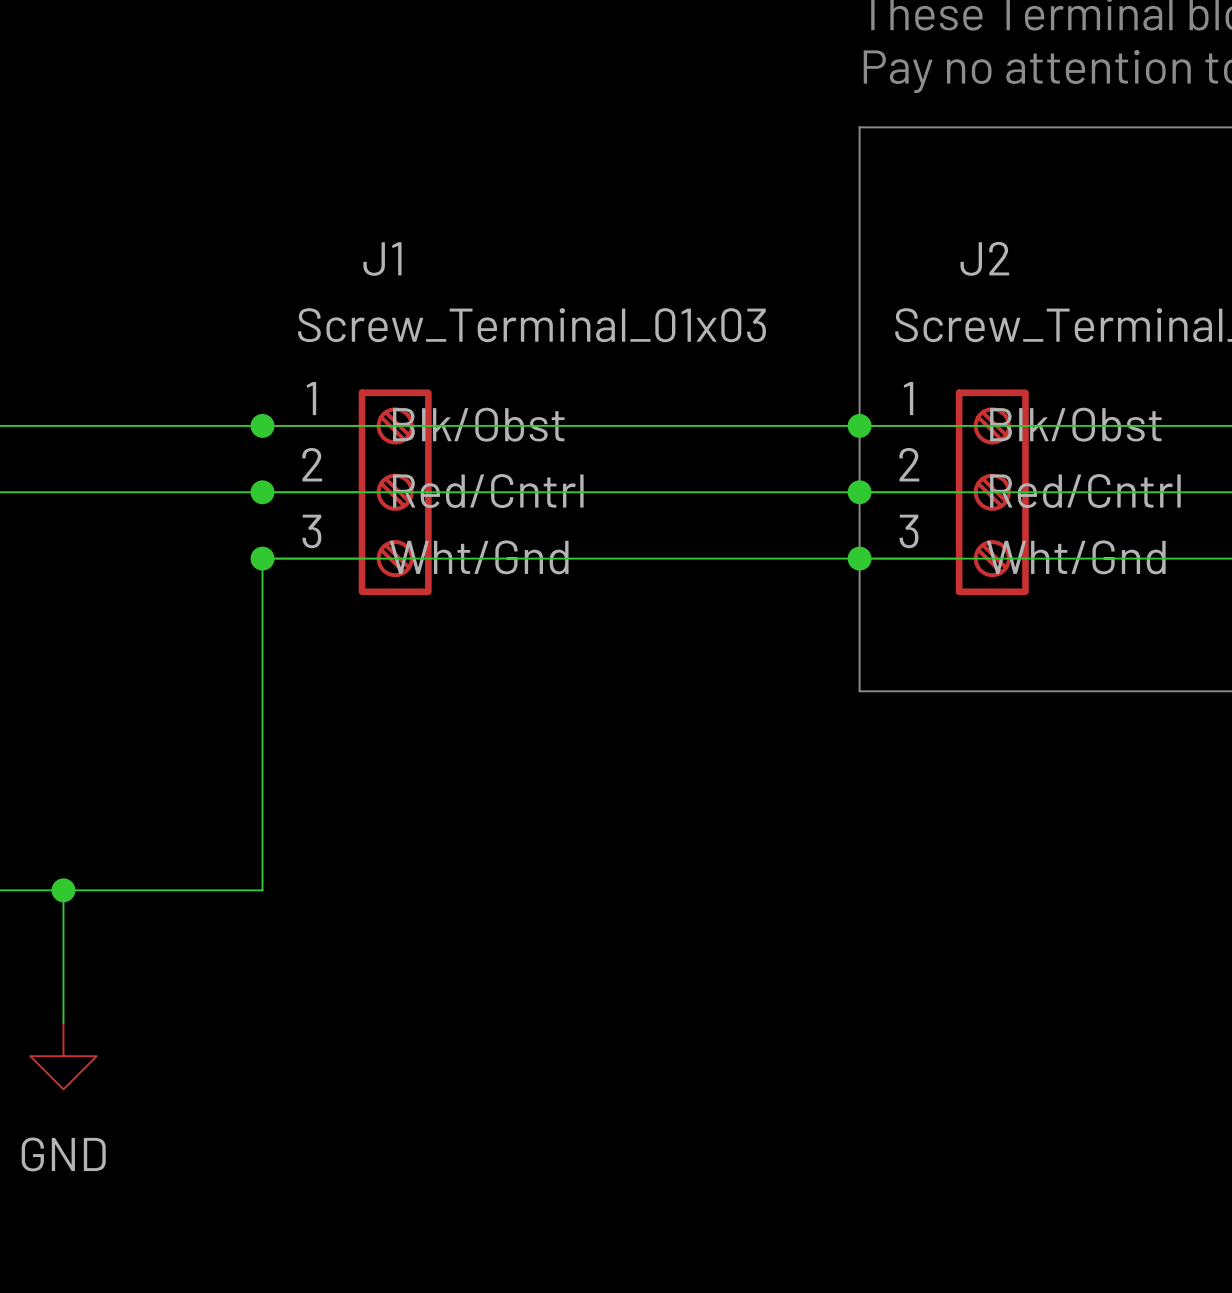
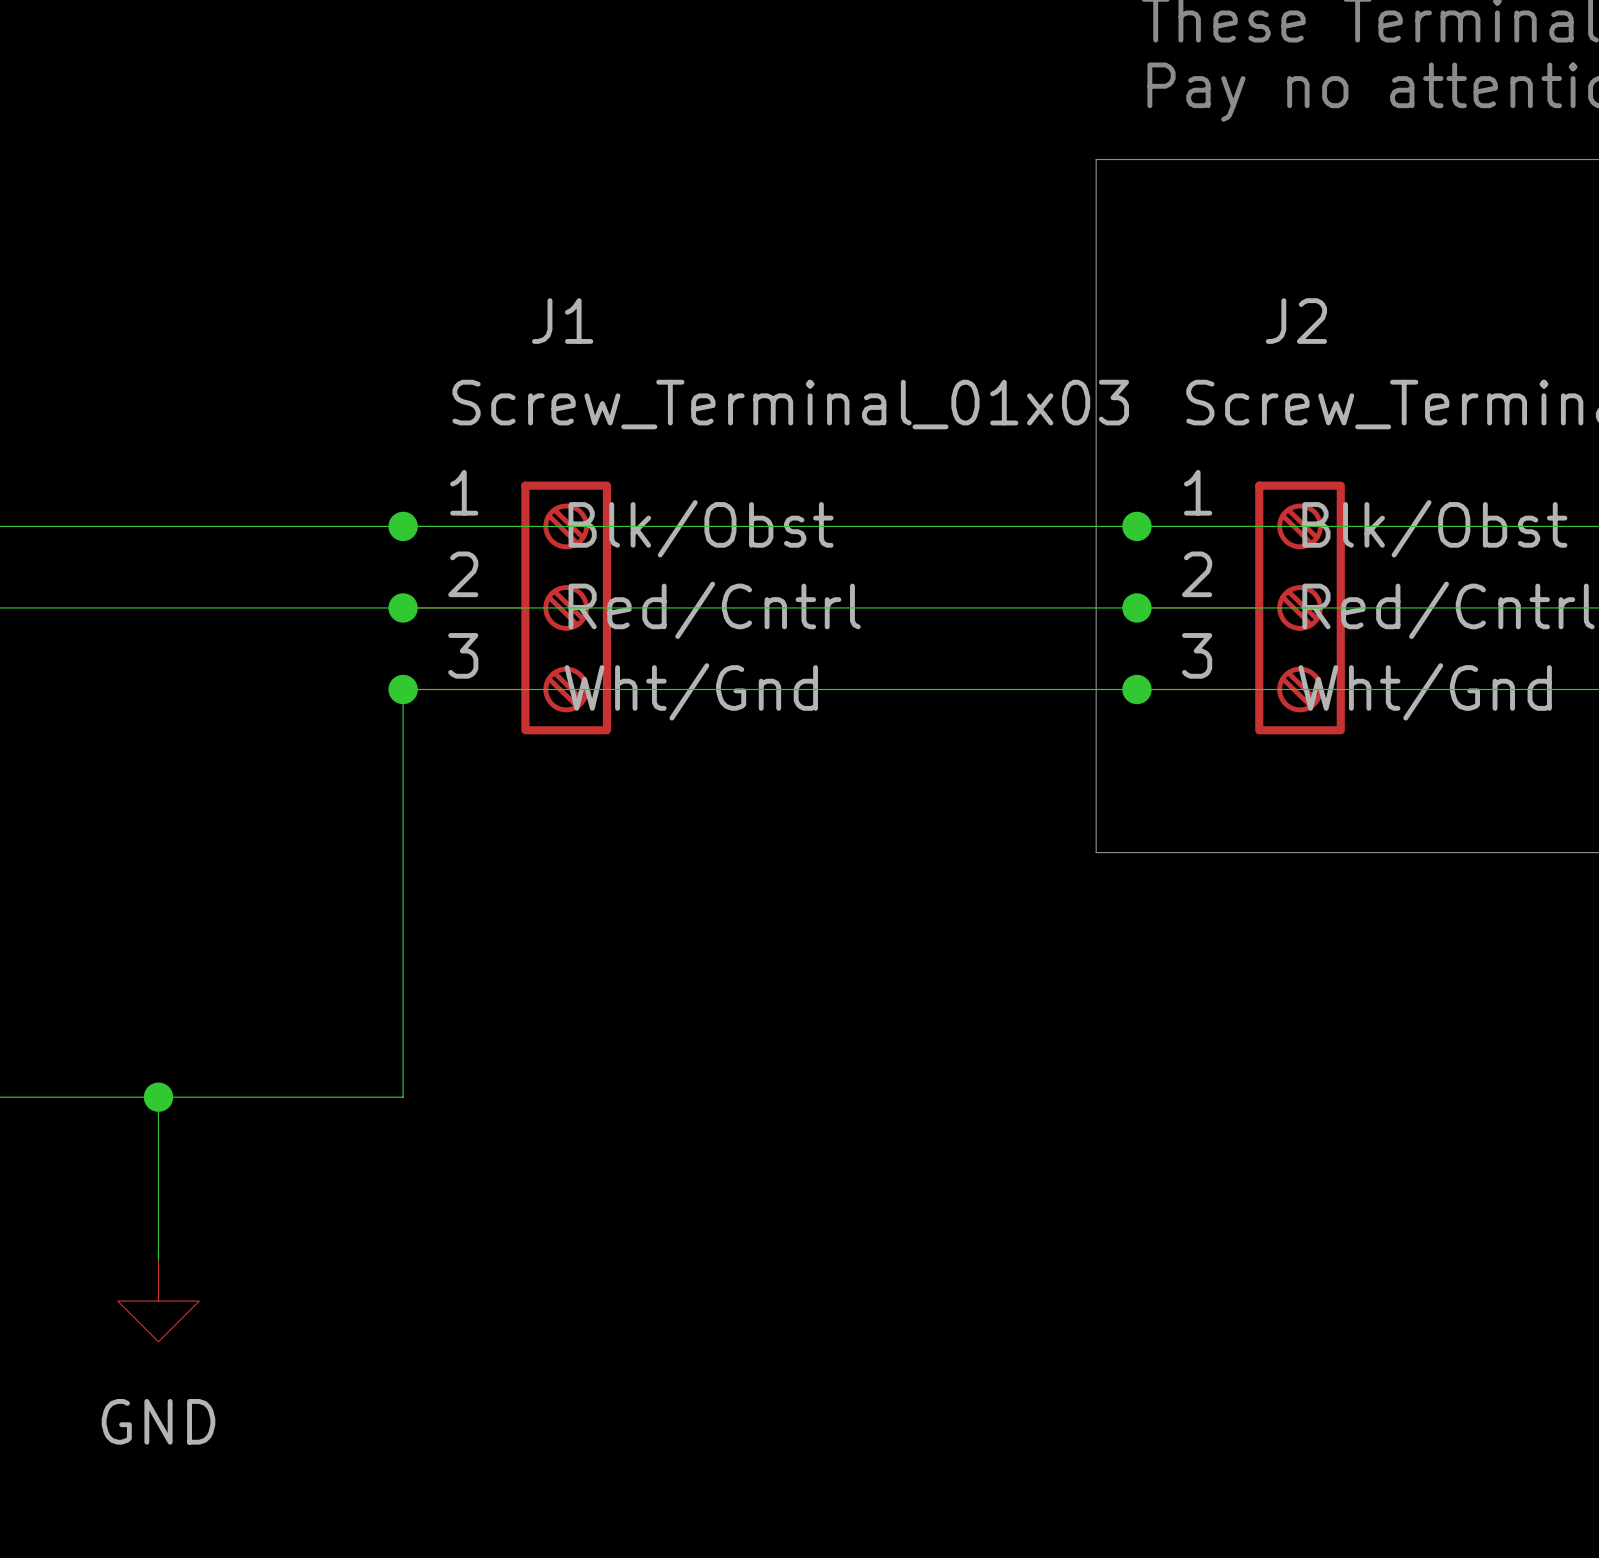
line: (859, 127) (859, 691) -> (1136, 159) (1096, 159) (1096, 852) (1136, 852)

